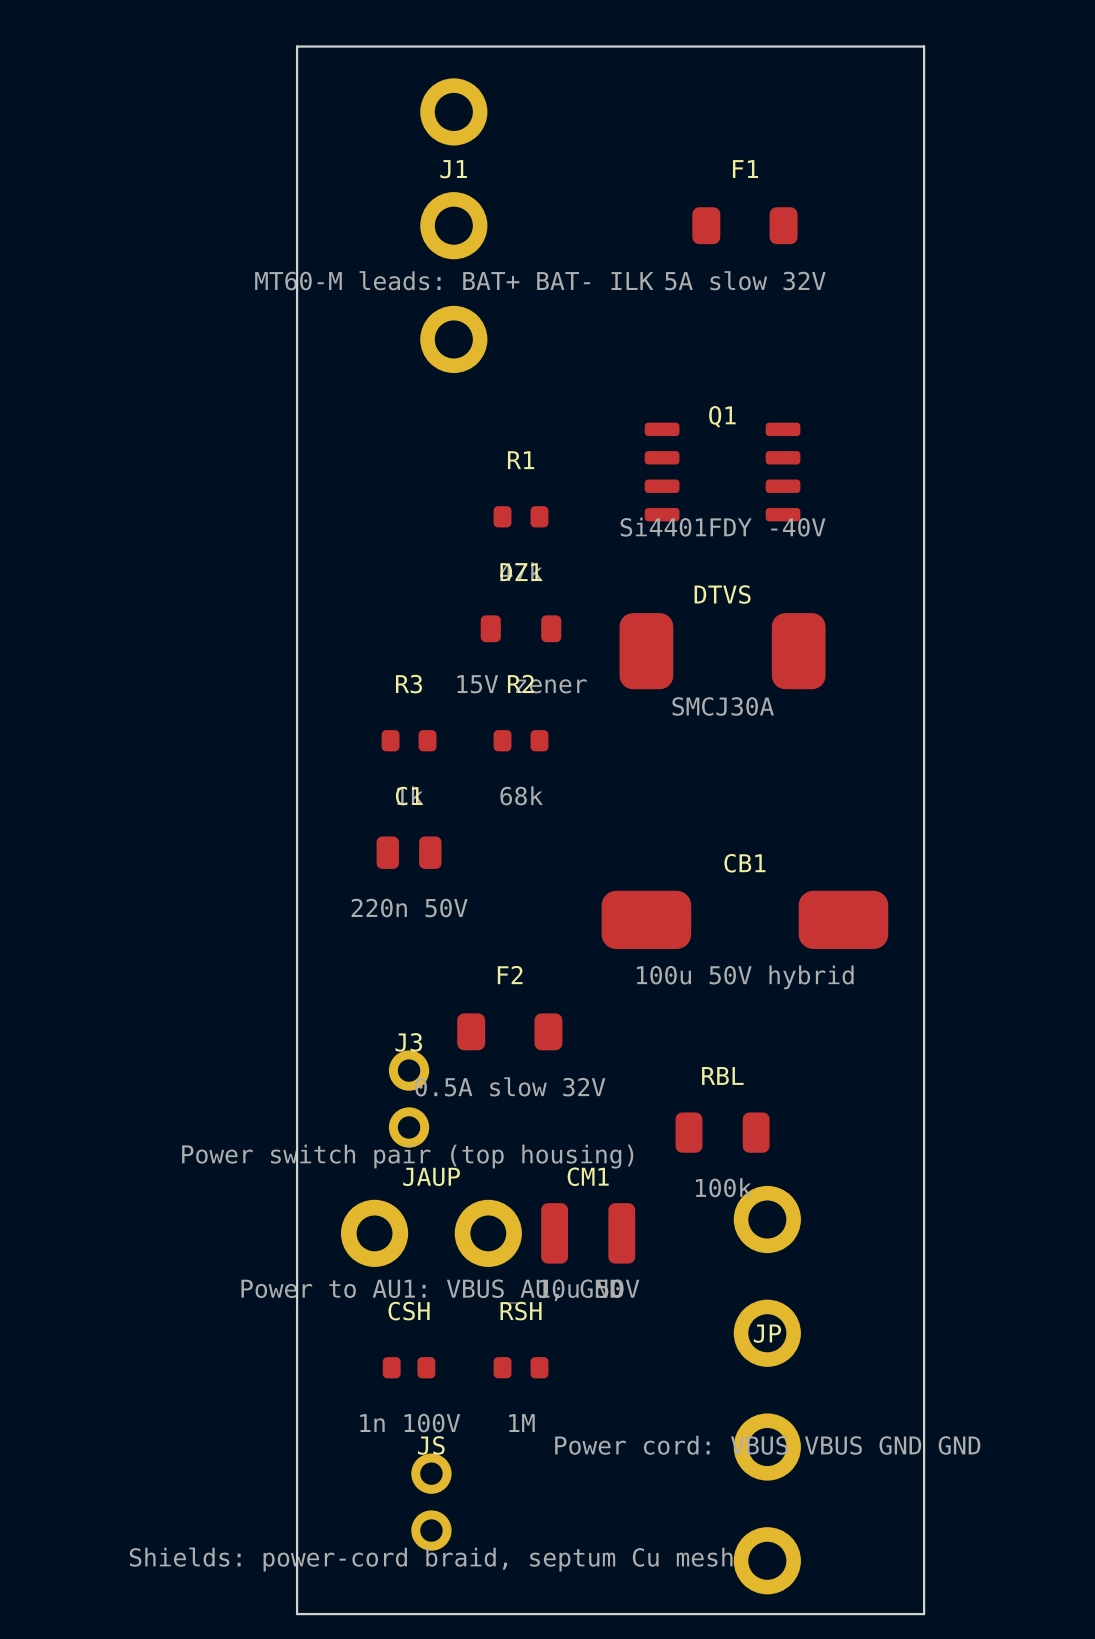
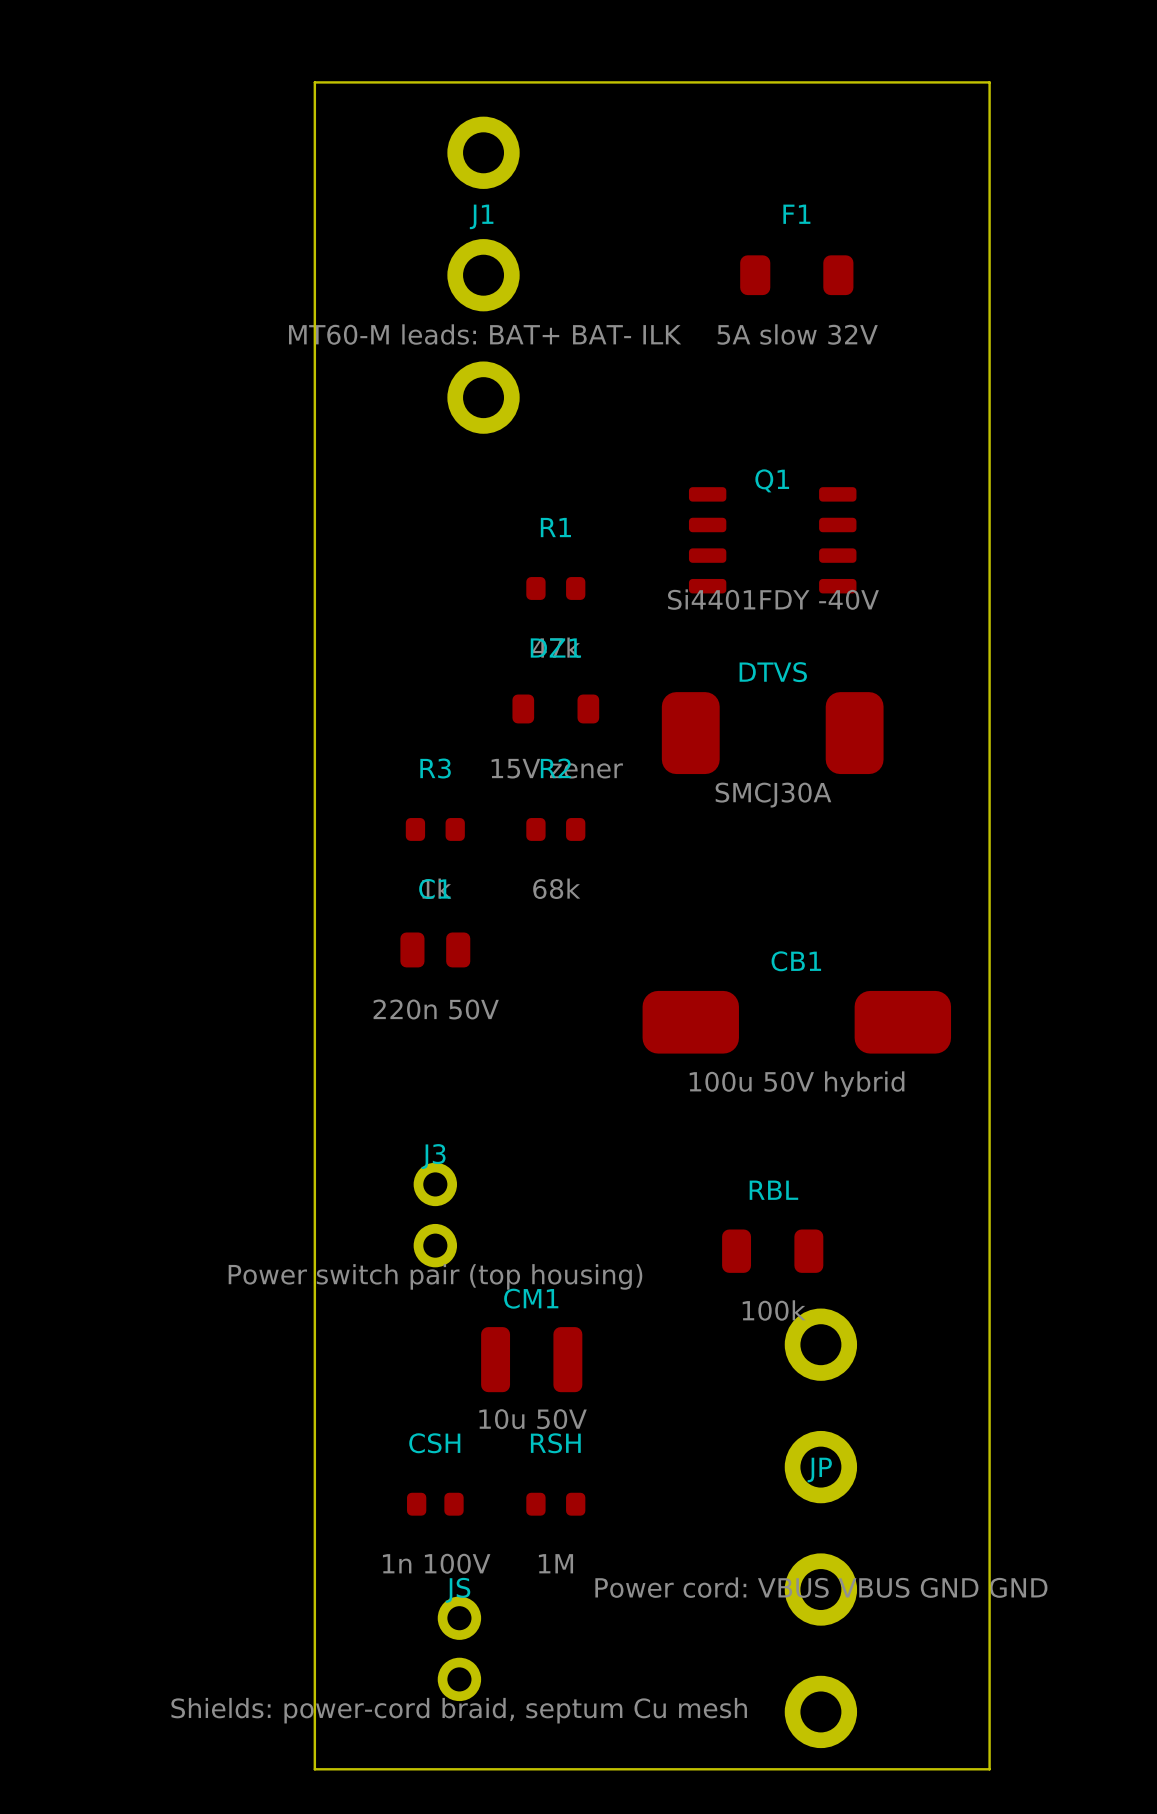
F2: 0.5A slow 32V (509, 1031) -> none
JAUP: Power to AU1: VBUS_AU, GND (431, 1233) -> none
CM1 position: (588, 1233) -> (531, 1359)

